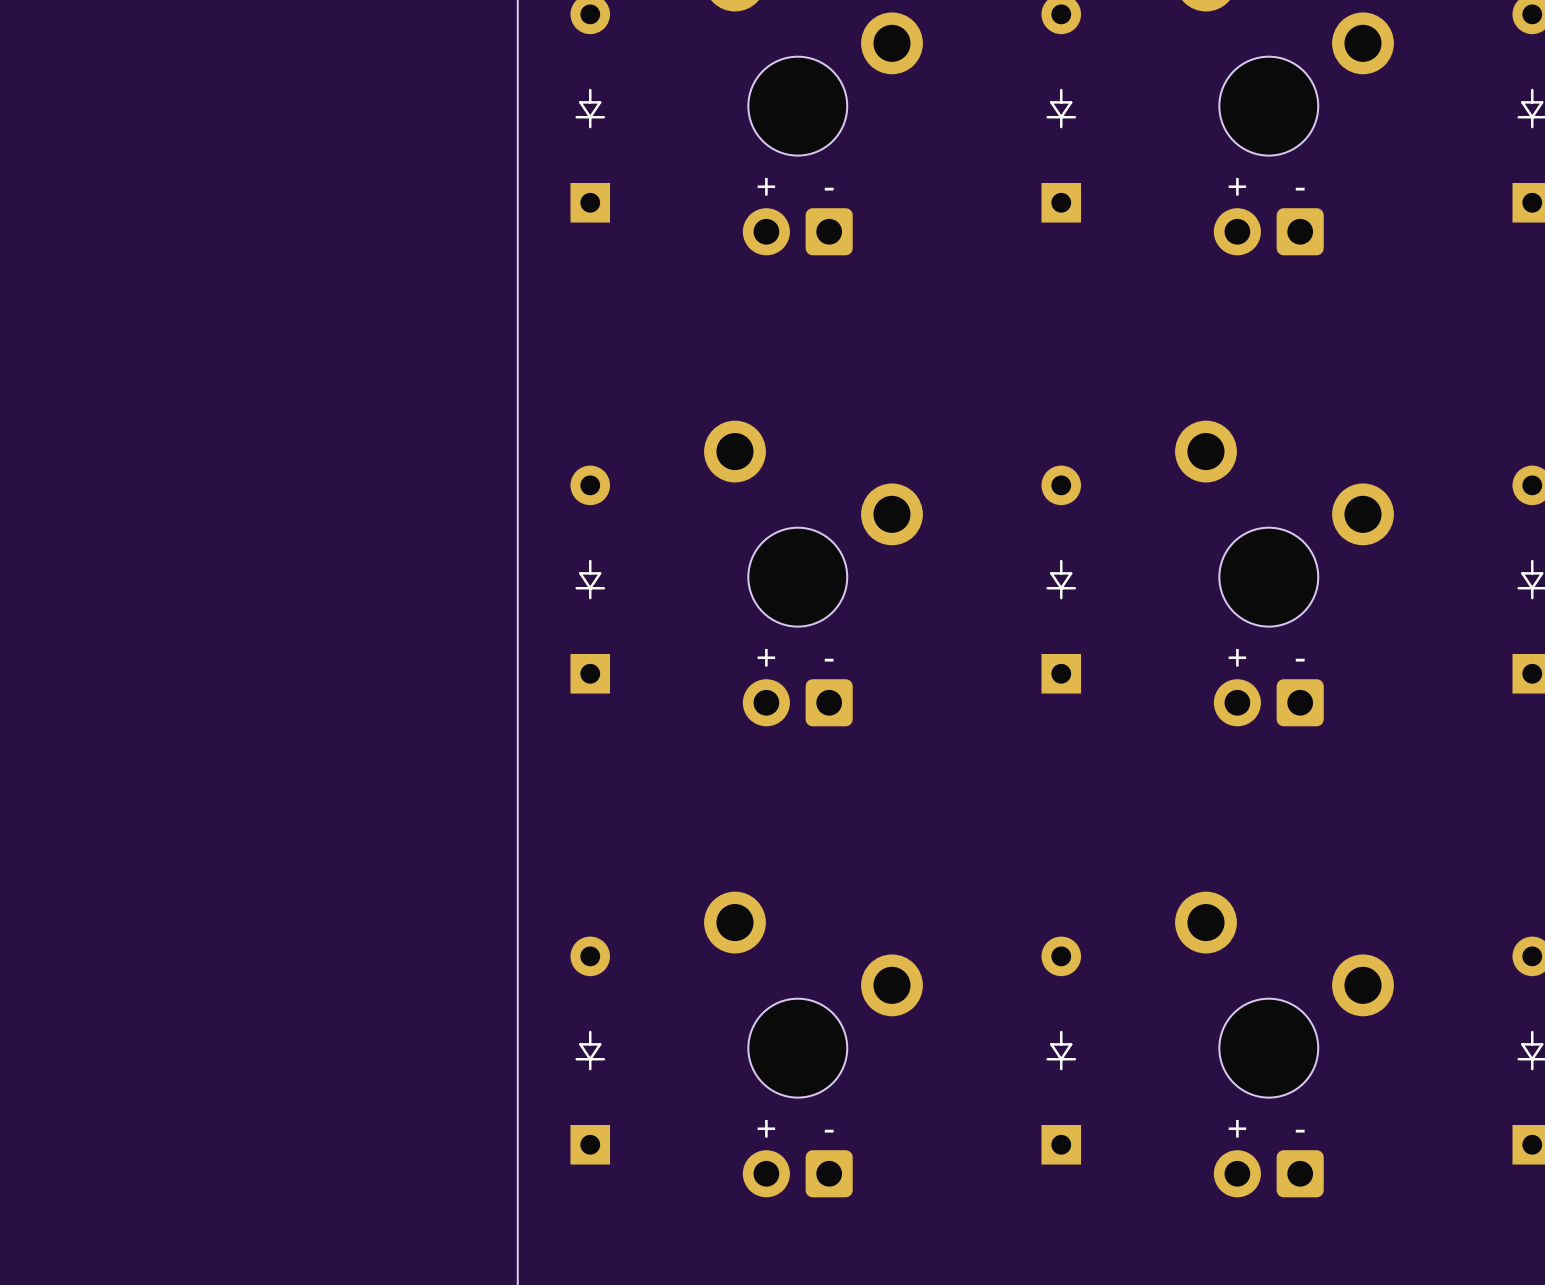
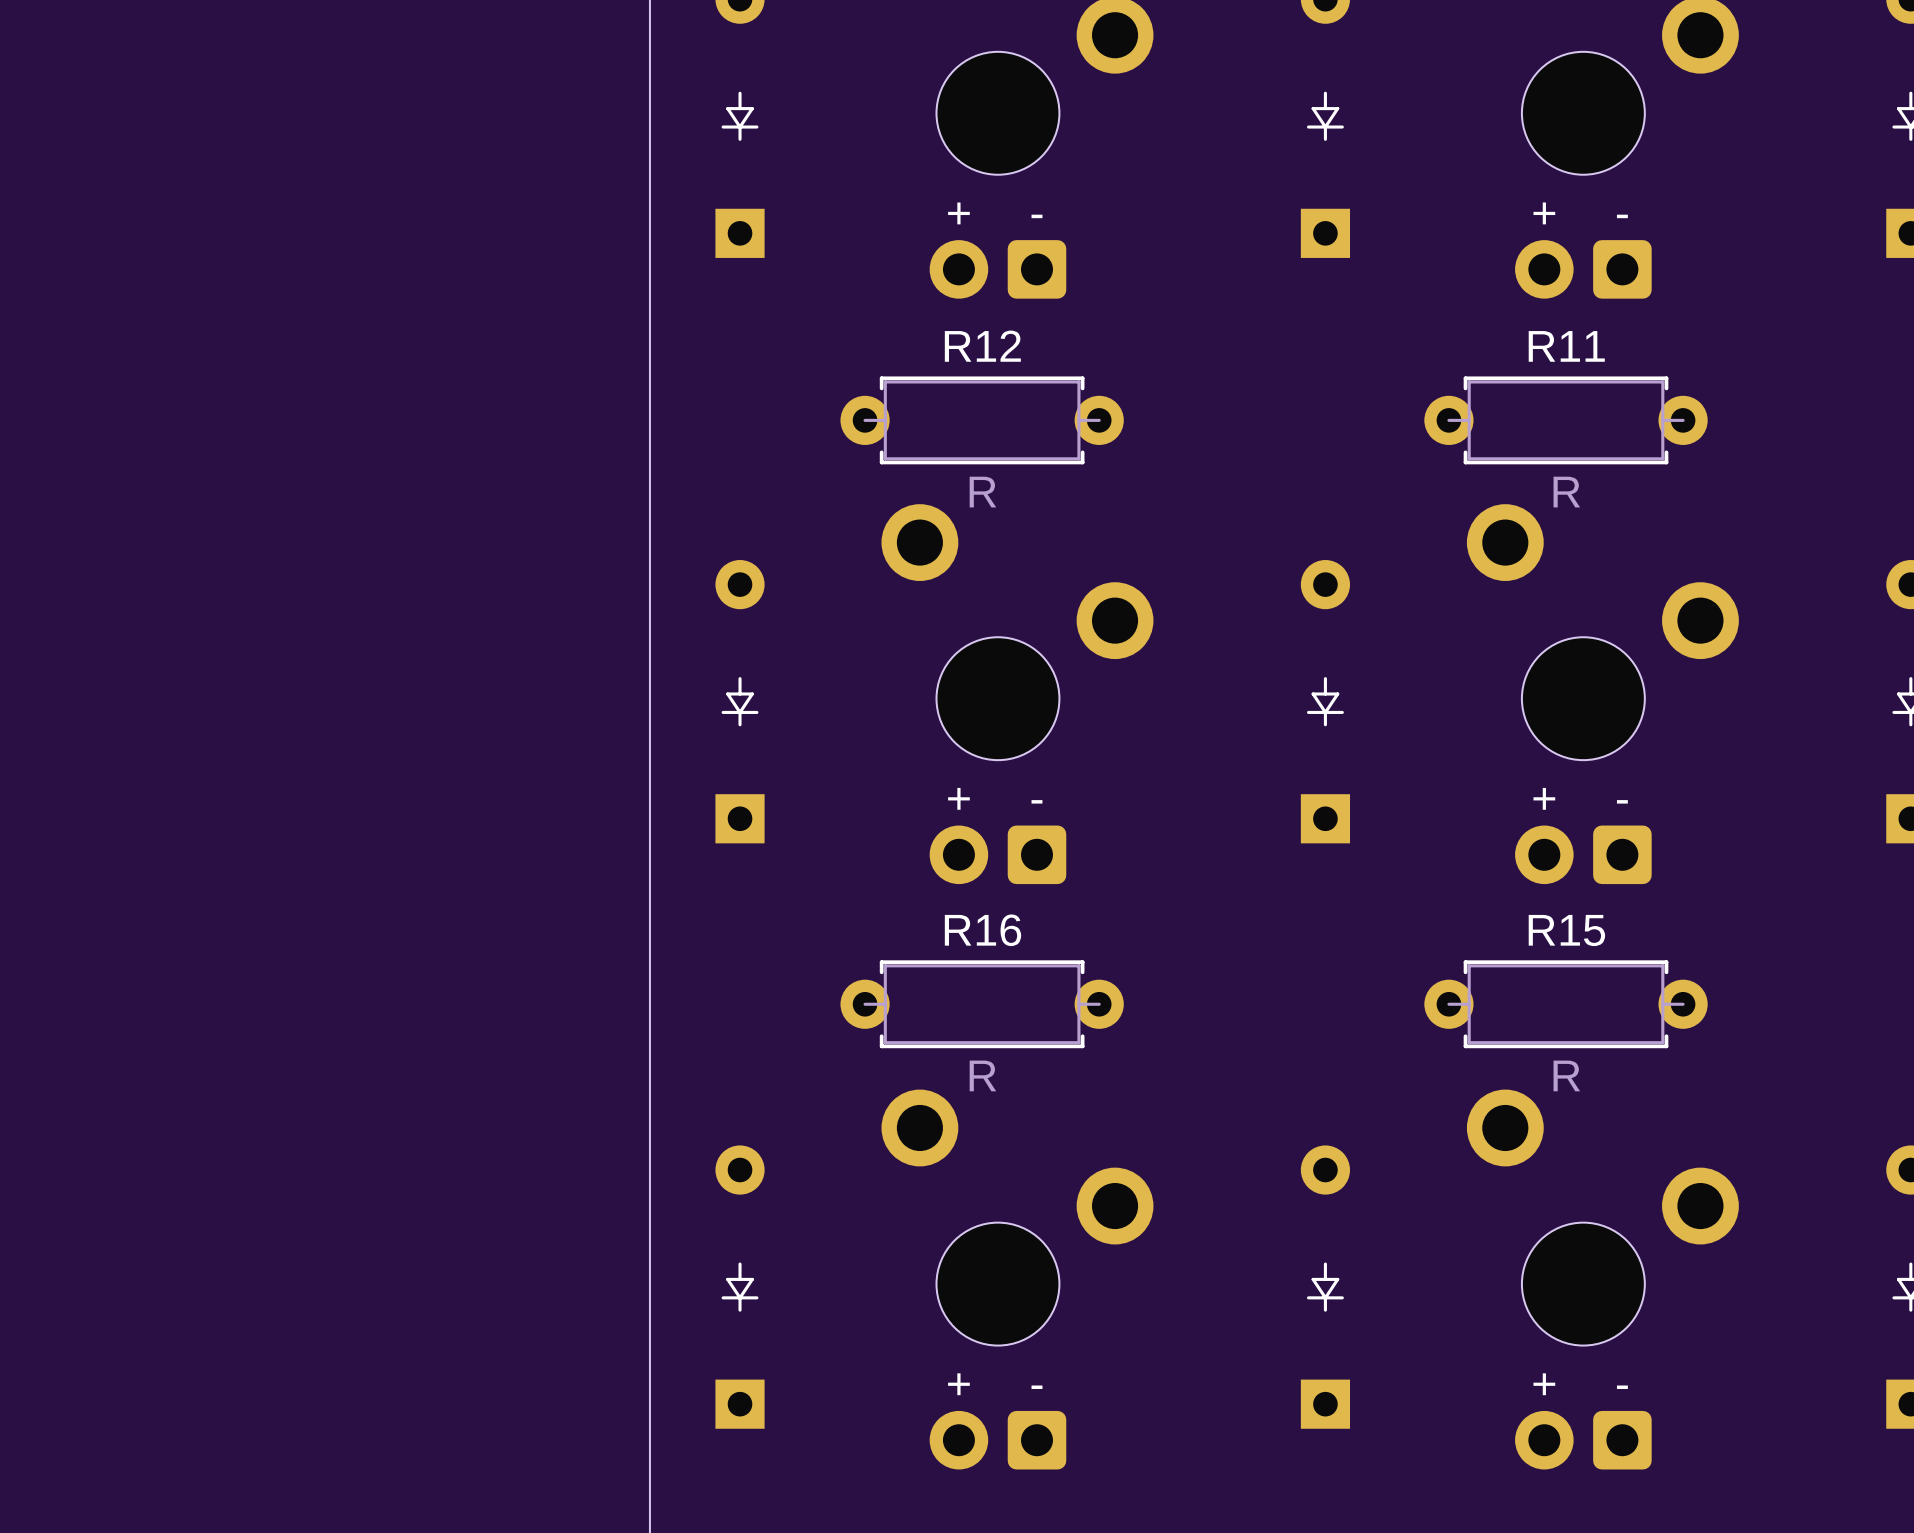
R12: none -> R (982, 420)
R11: none -> R (1566, 420)
R16: none -> R (982, 1004)
R15: none -> R (1566, 1004)

